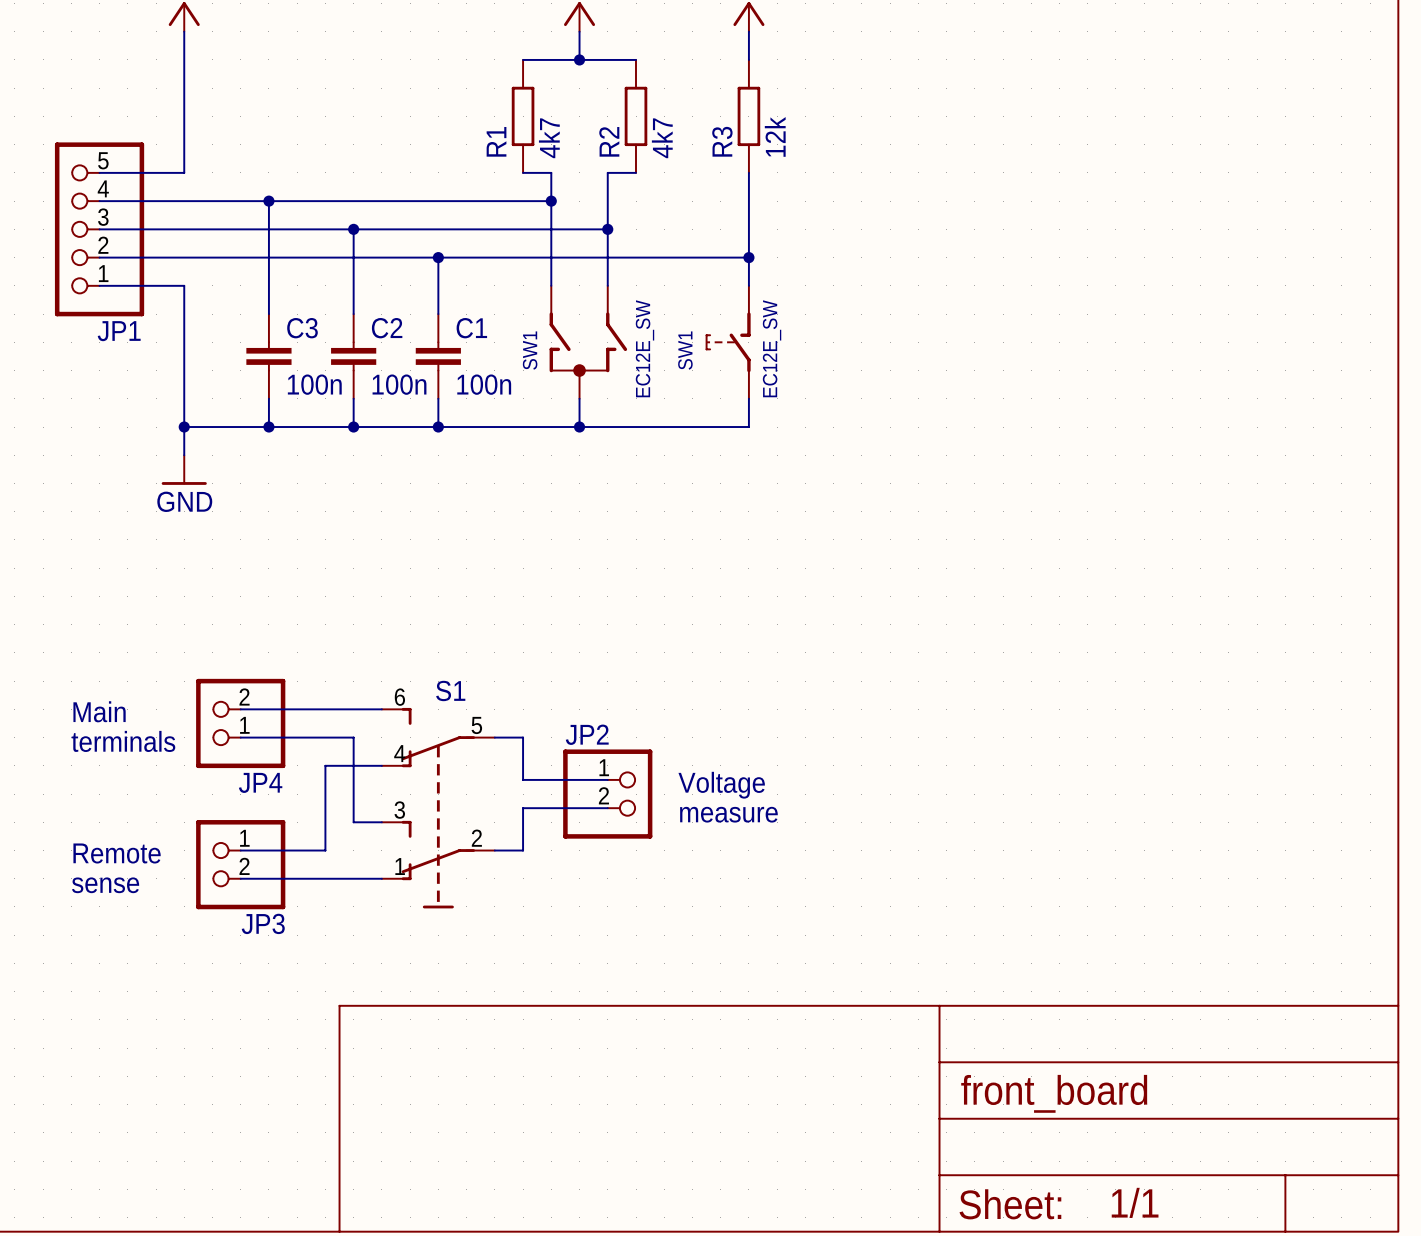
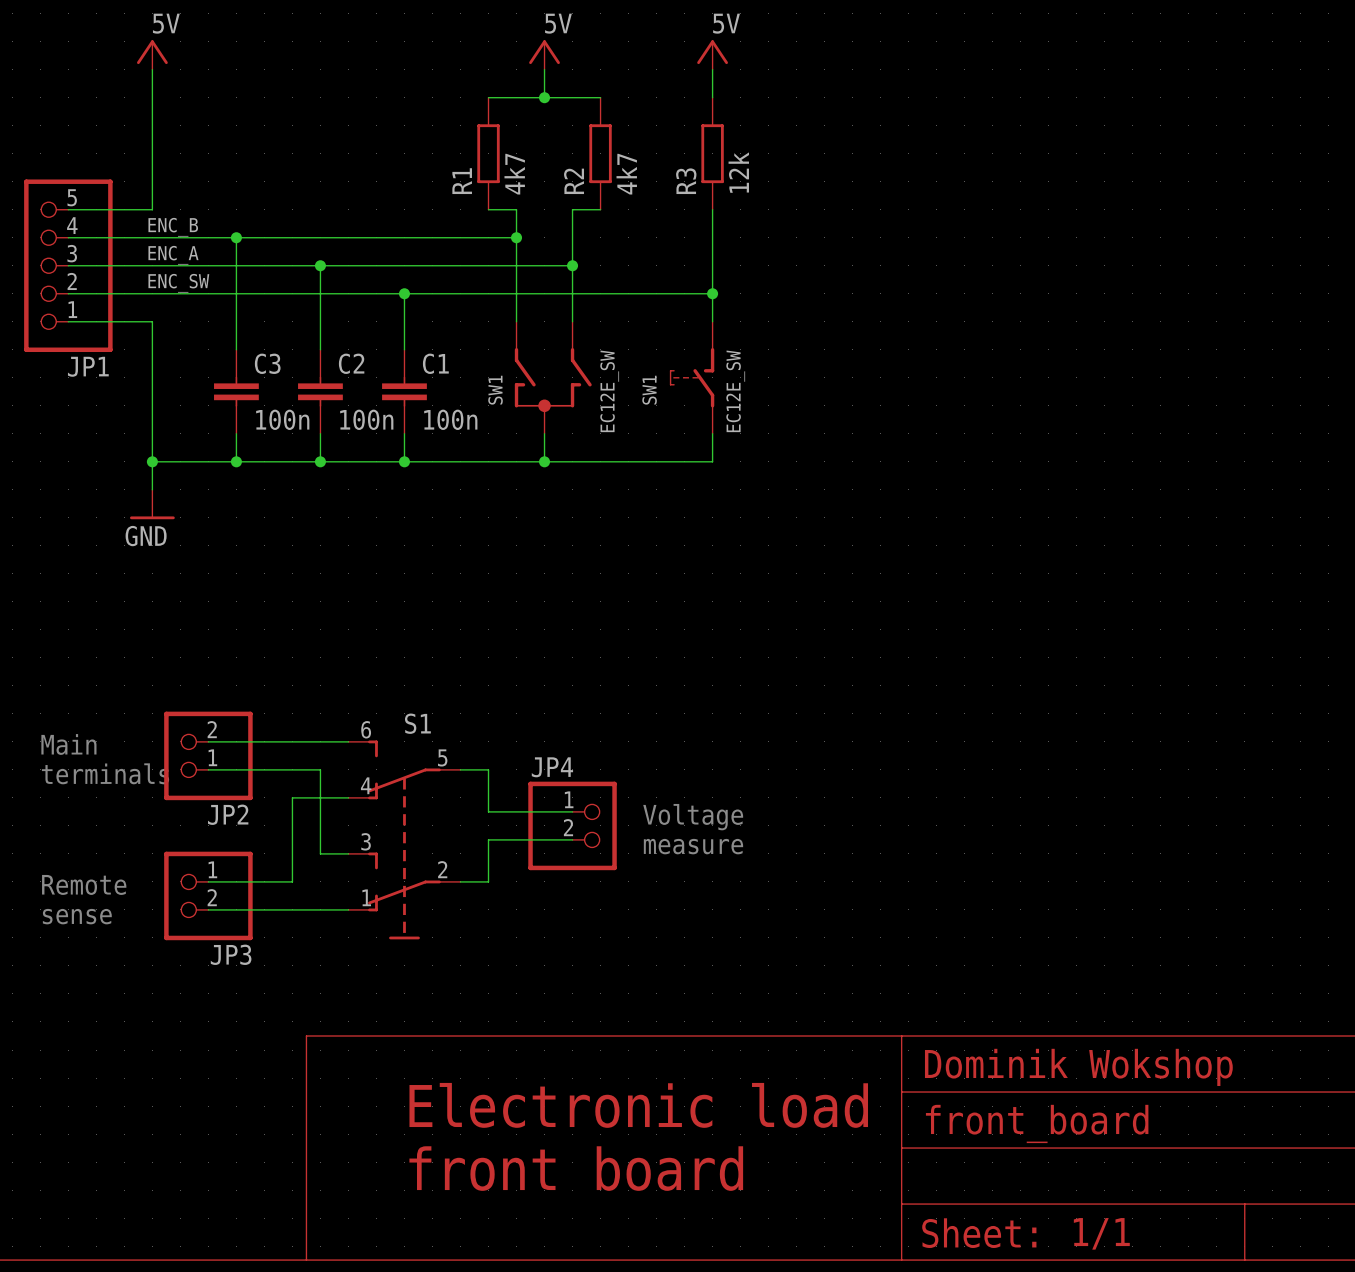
label: none -> ENC_B (173, 227)
label: none -> ENC_A (173, 255)
label: none -> ENC_SW (178, 283)
JP2 name: JP2 (587, 734) -> JP4 (552, 767)
JP4 name: JP4 (260, 782) -> JP2 (228, 814)
text: none -> Dominik Wokshop (1078, 1067)
text: none -> Electronic load (638, 1105)
text: none -> front board (576, 1168)

